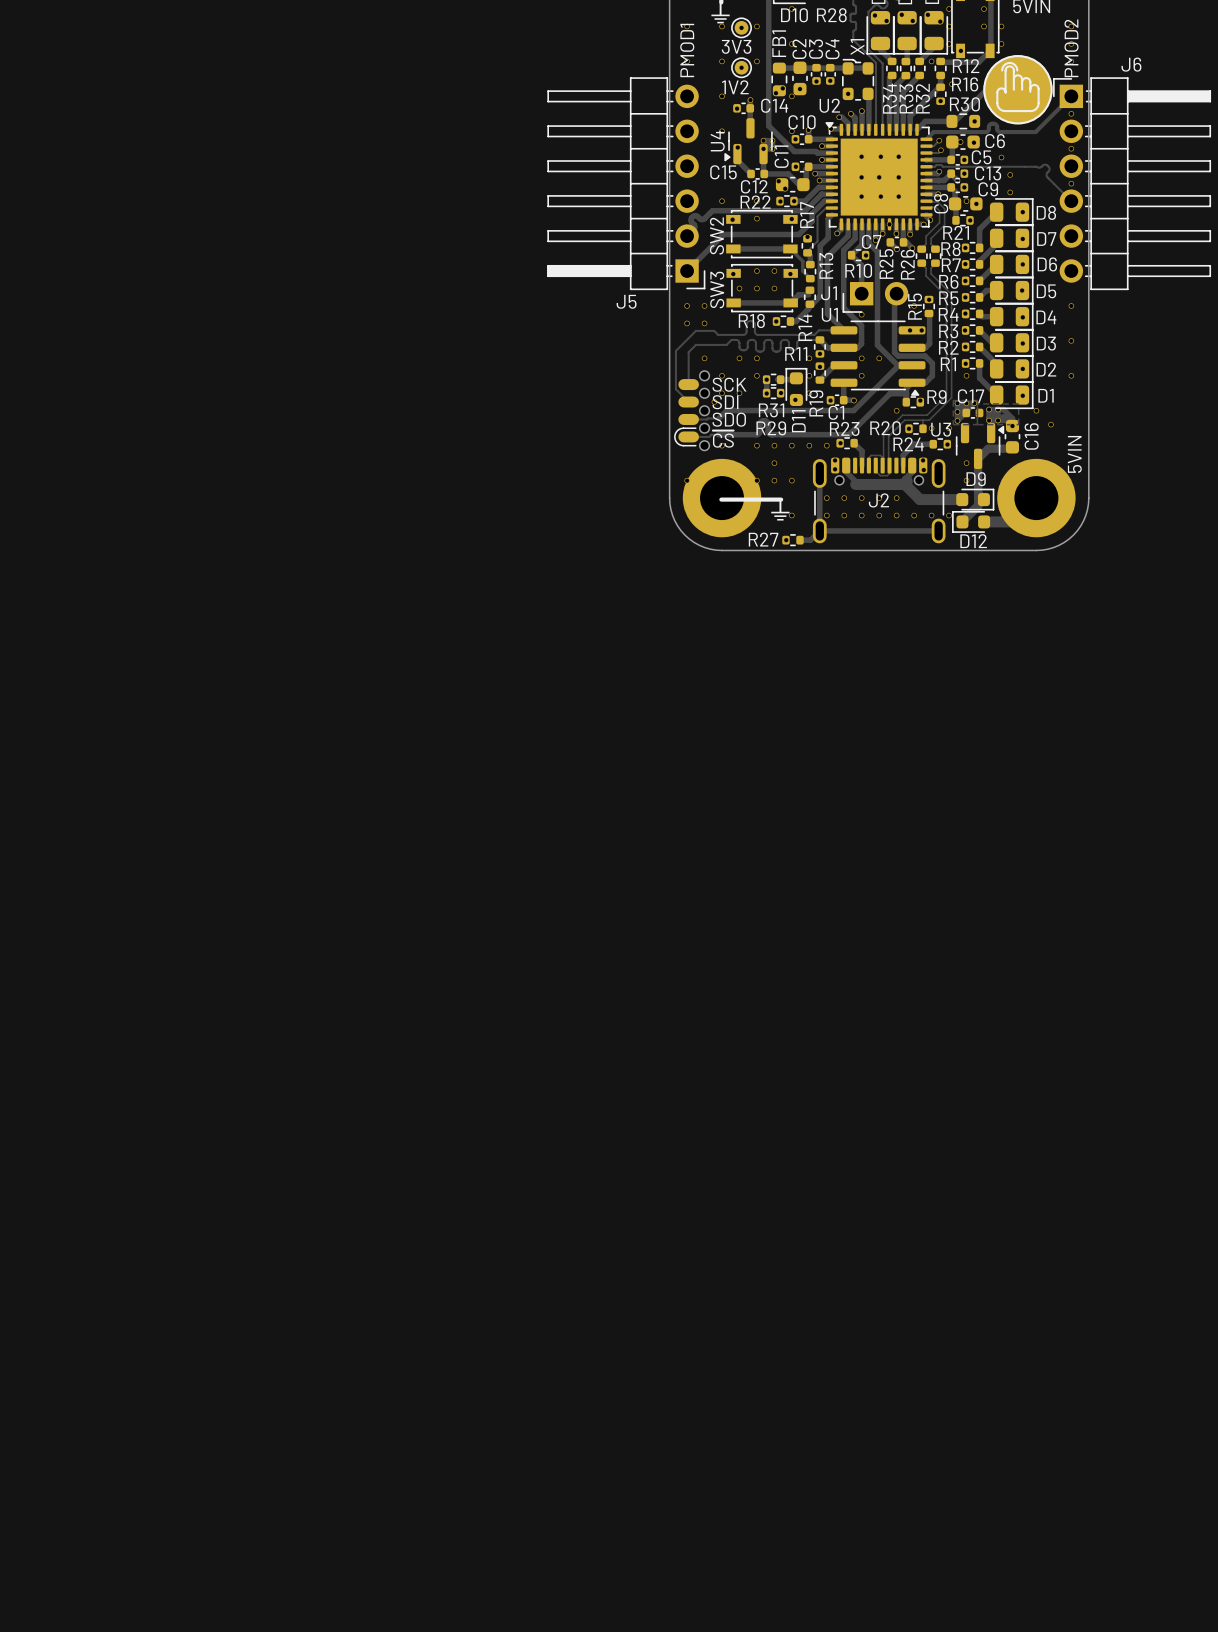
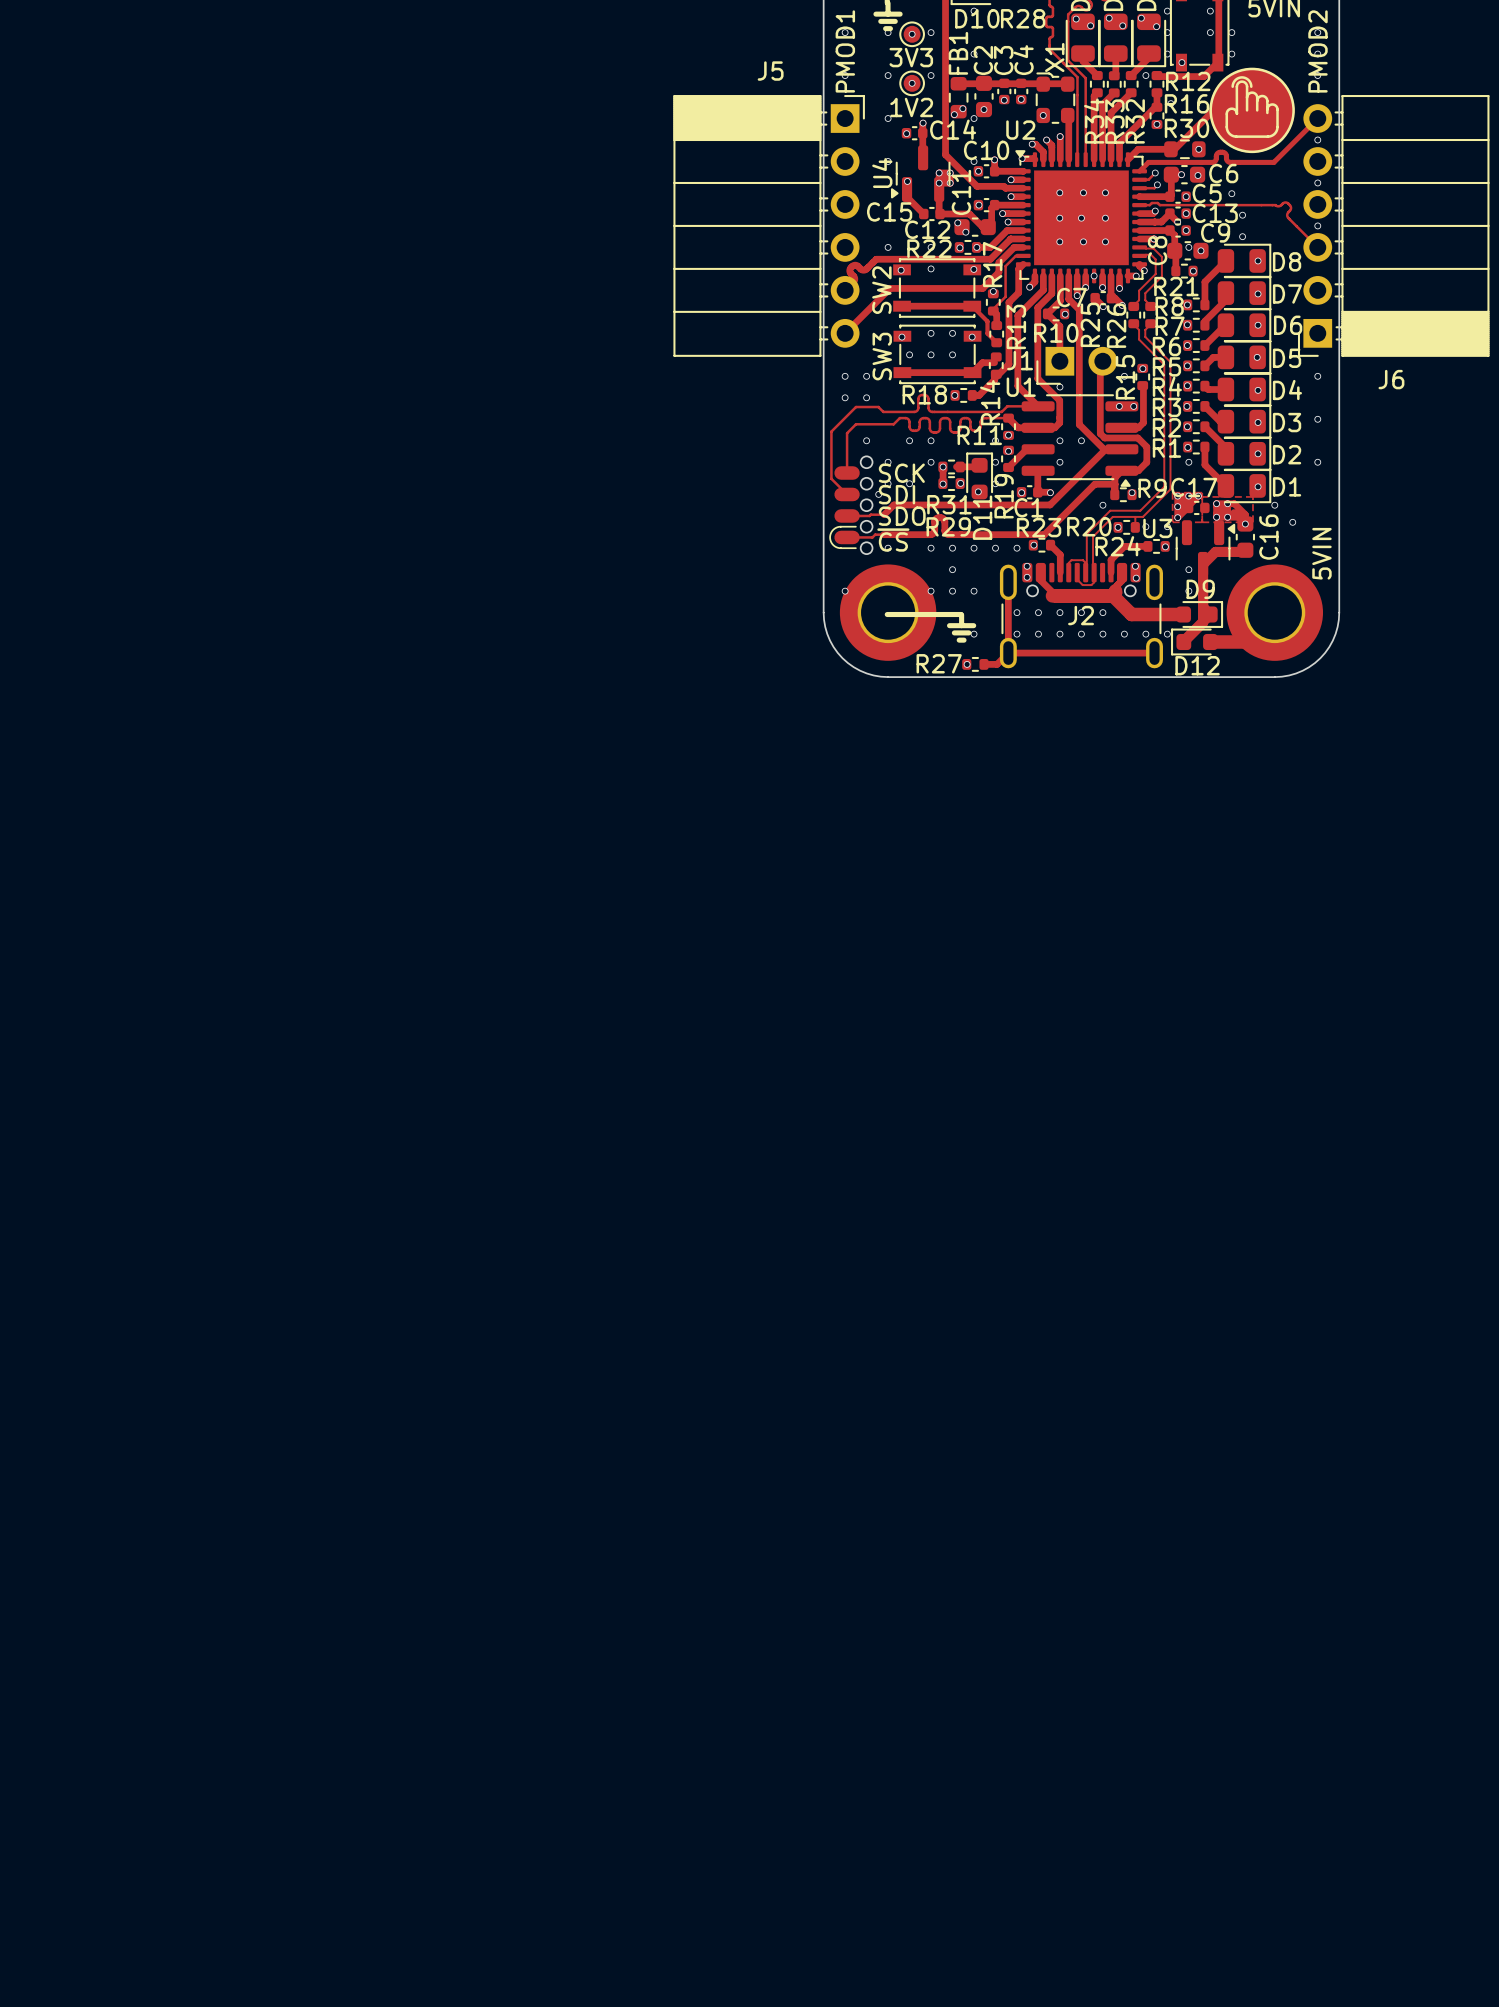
J6 name position: J6 (1131, 64) -> J6 (1391, 379)
J5 footprint: [547, 77, 706, 291] -> [673, 95, 865, 357]
J6 footprint: [1053, 77, 1212, 291] -> [1297, 95, 1490, 357]
J5 name position: J5 (626, 301) -> J5 (770, 71)

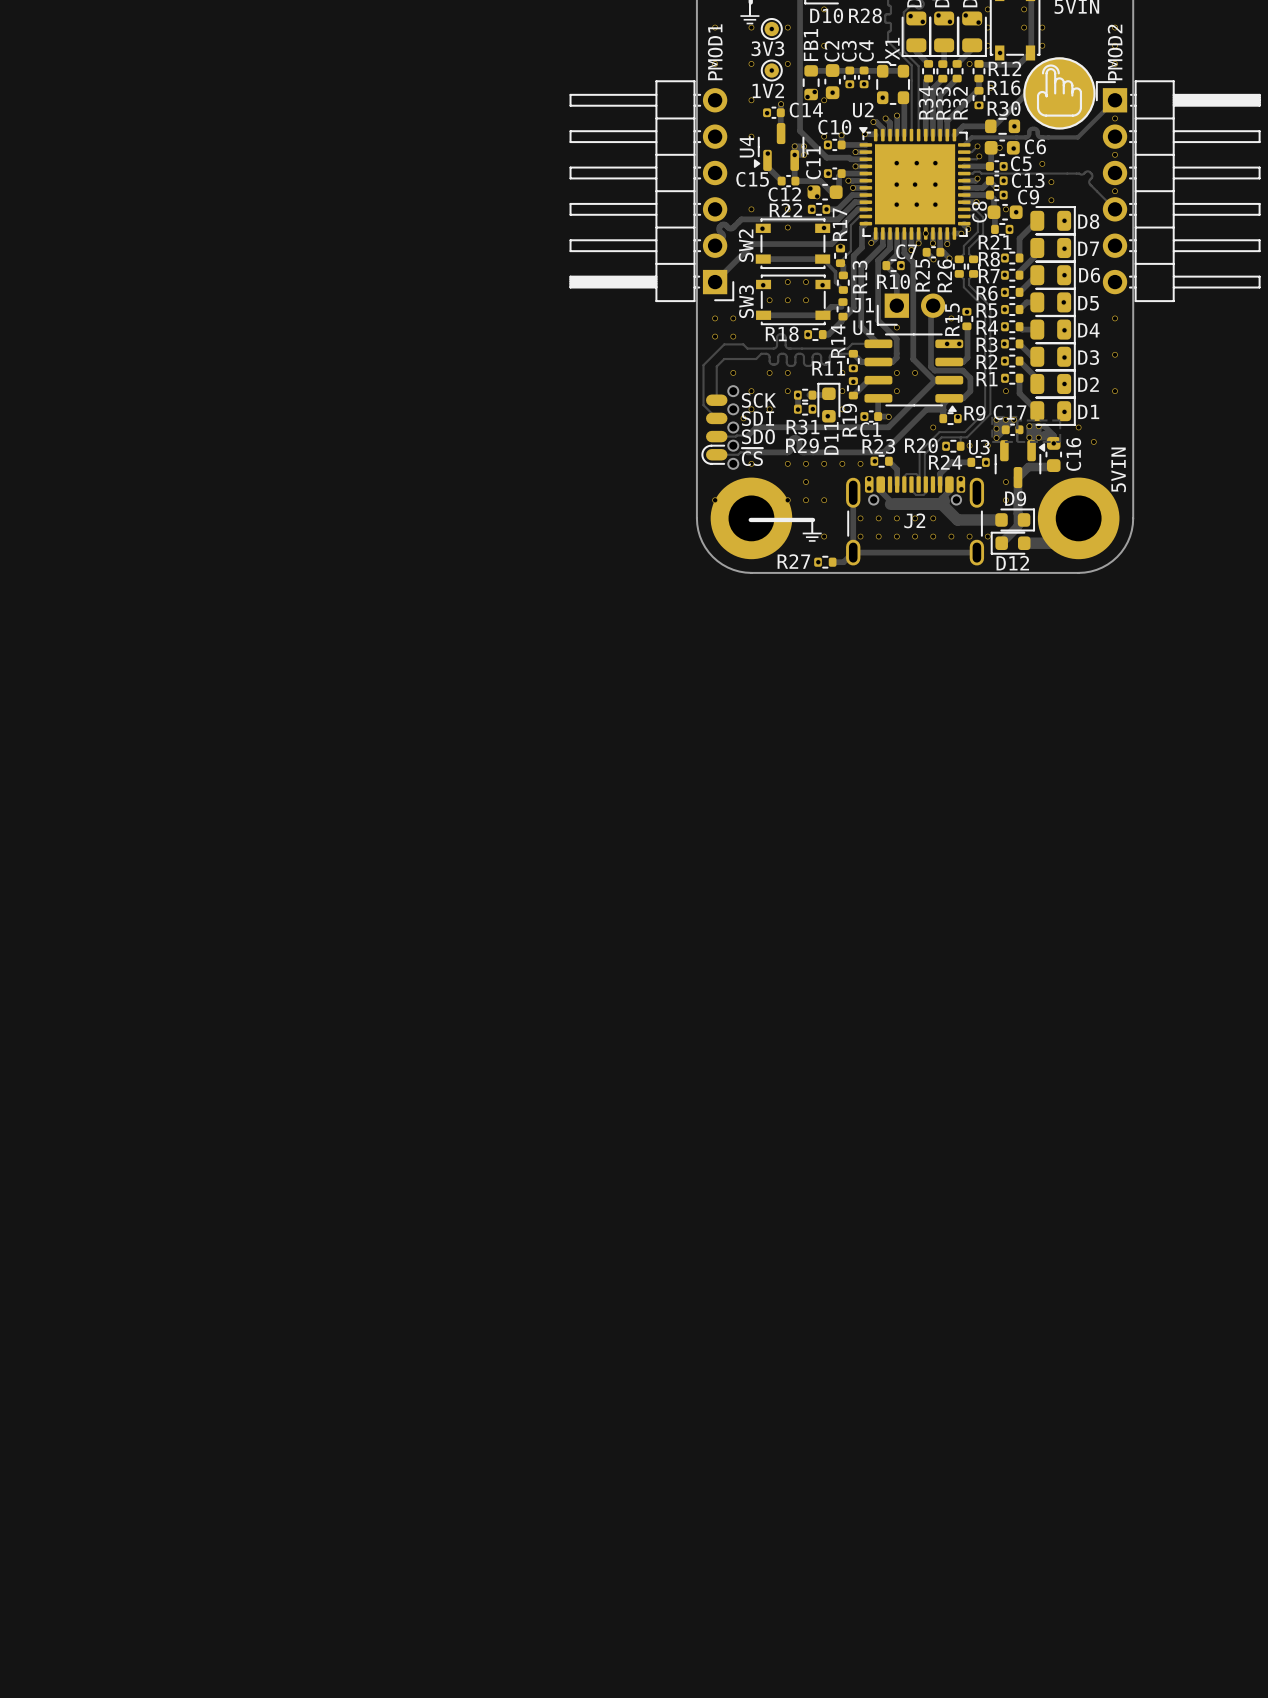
J5: (769, 225) -> none
part: none -> (651, 191)
part: none -> (1178, 191)
J6: (1393, 225) -> none

